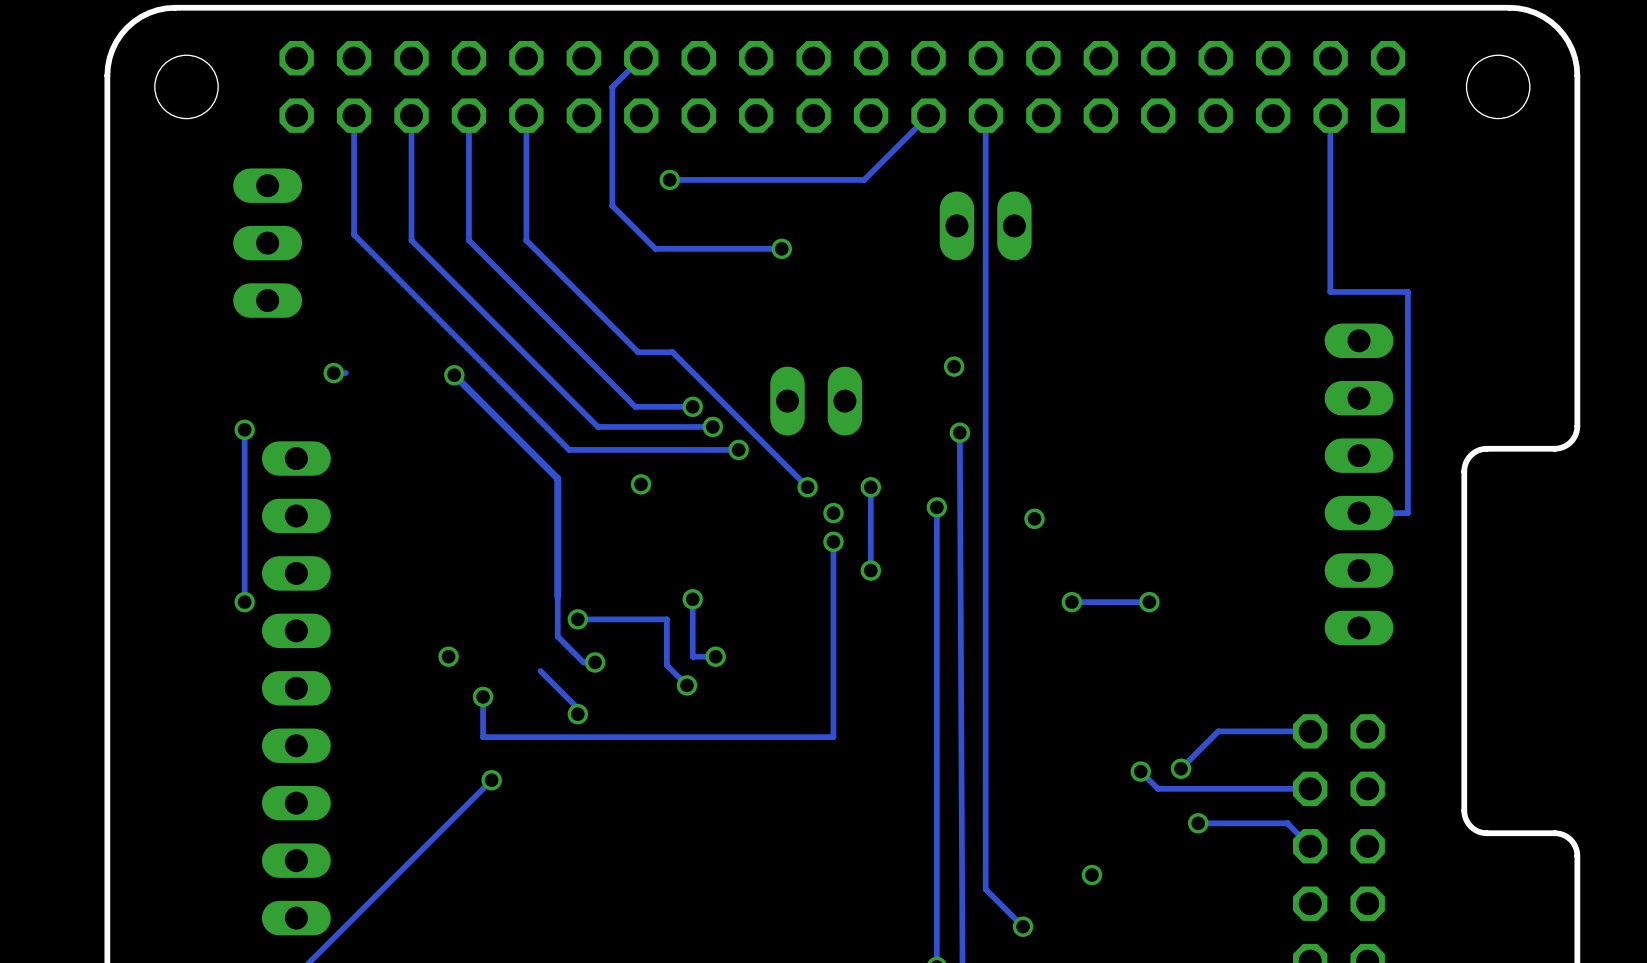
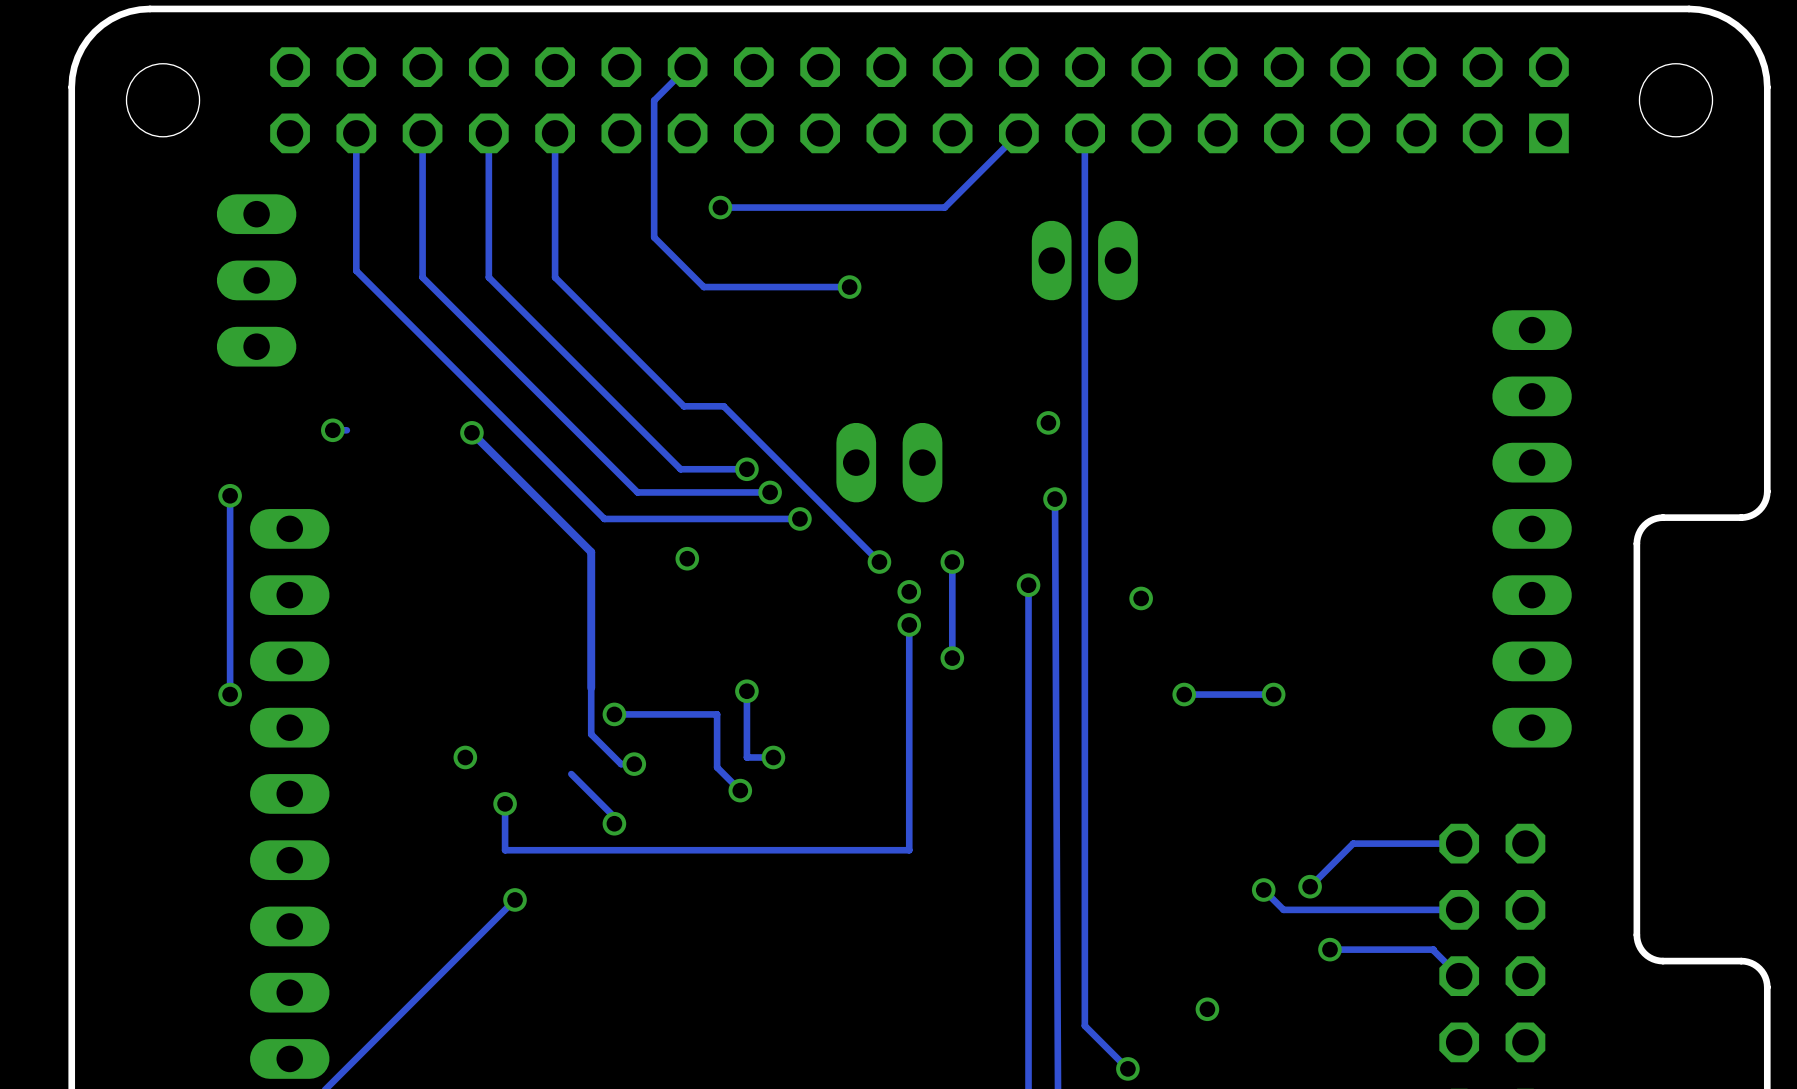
track: (1330, 115) (1330, 291) (1407, 291) (1407, 513) (1359, 513) -> none
part: none -> (1532, 528)
part: (1359, 484) -> none

